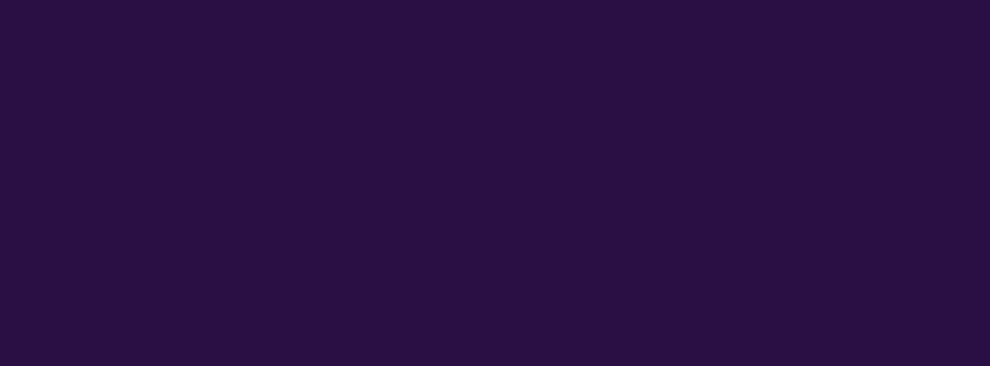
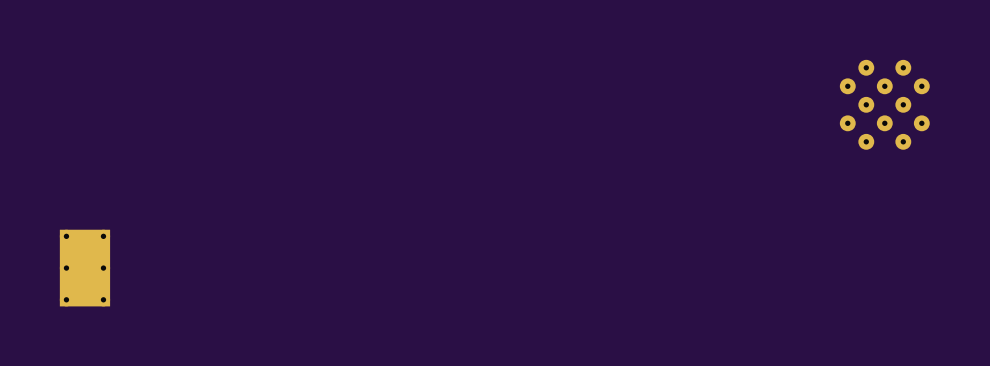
part: none -> (884, 104)
part: none -> (84, 268)

